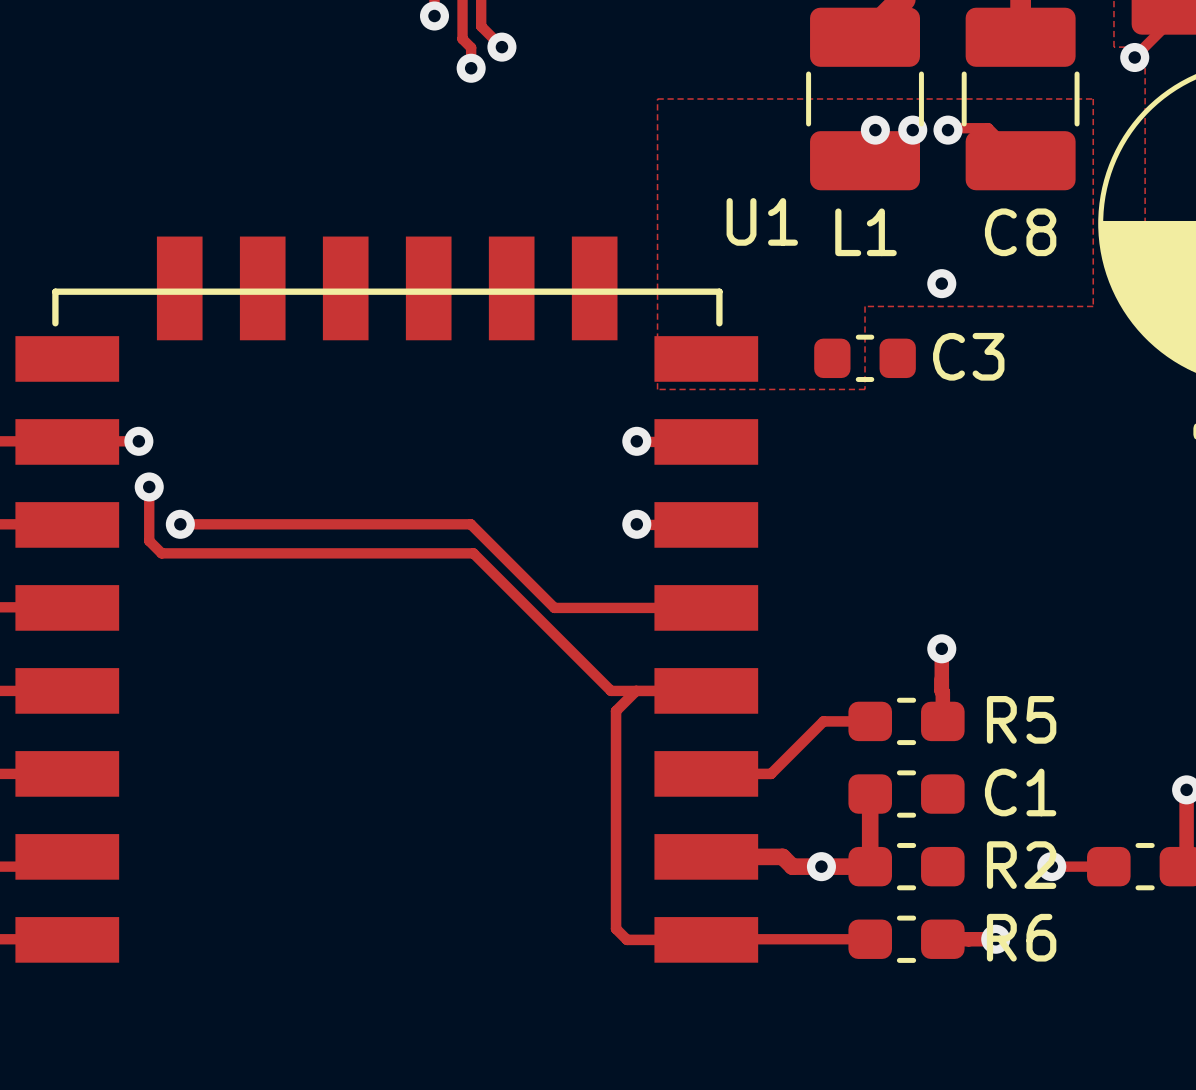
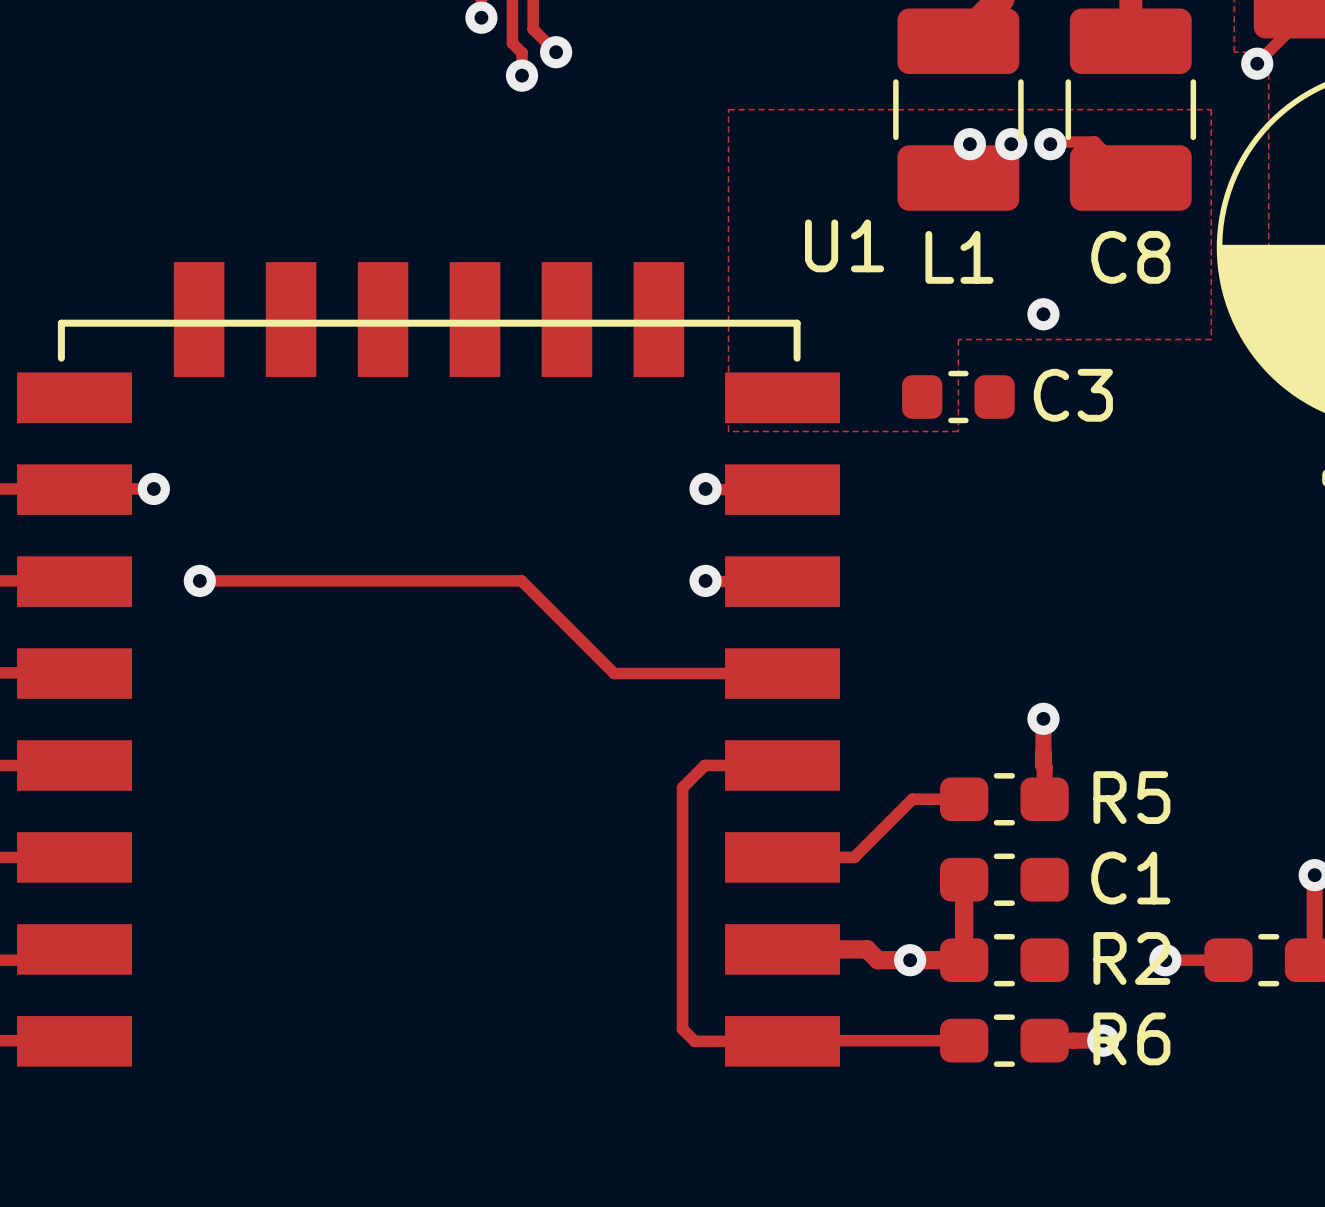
track: (149, 486) (149, 540) (161, 553) (473, 553) (611, 690) (636, 690) -> none
via: (149, 486) -> none

